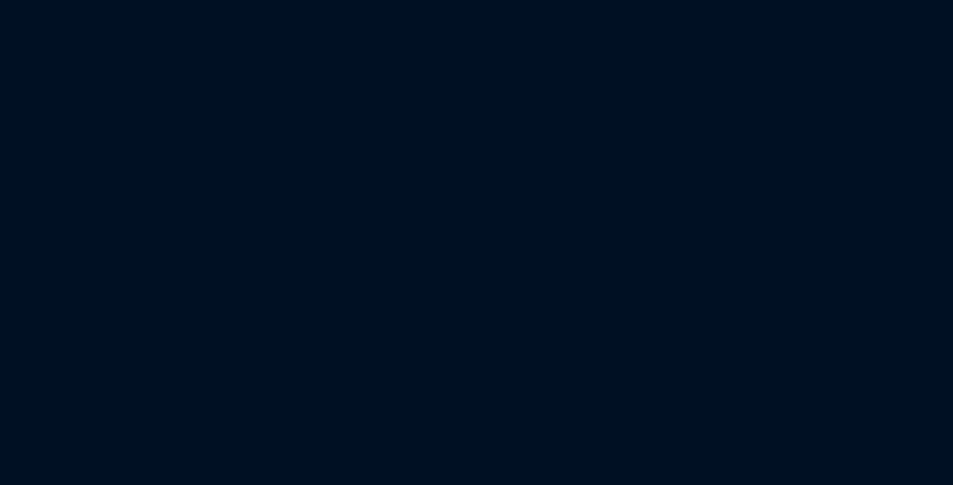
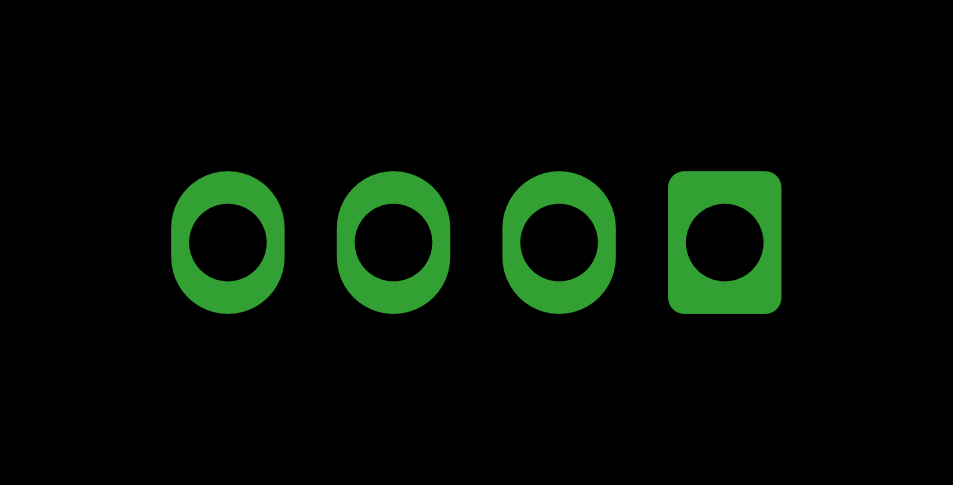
part: none -> (476, 242)

